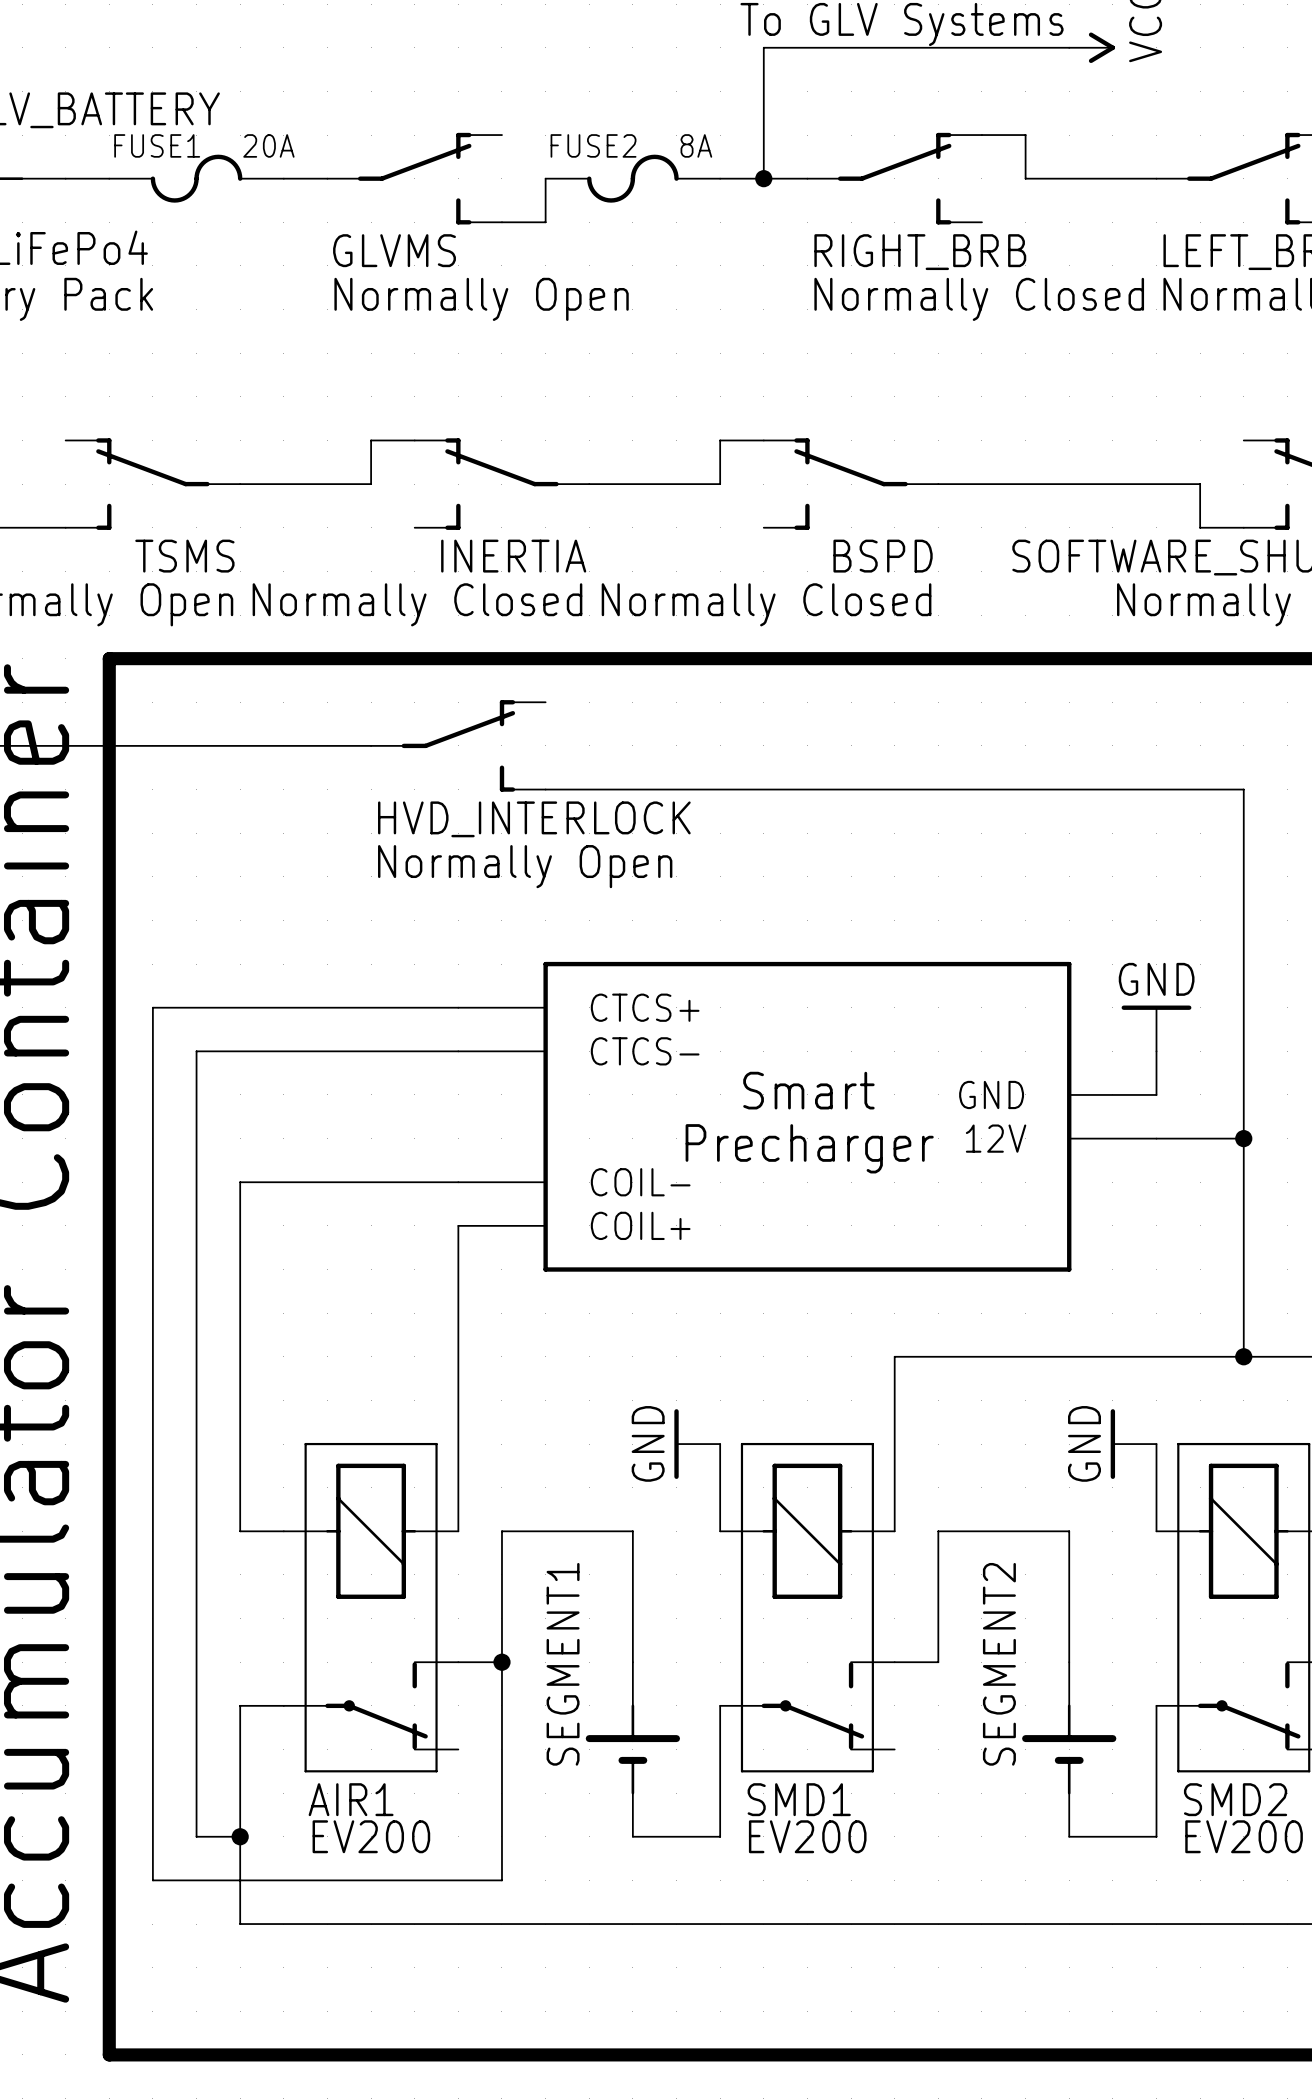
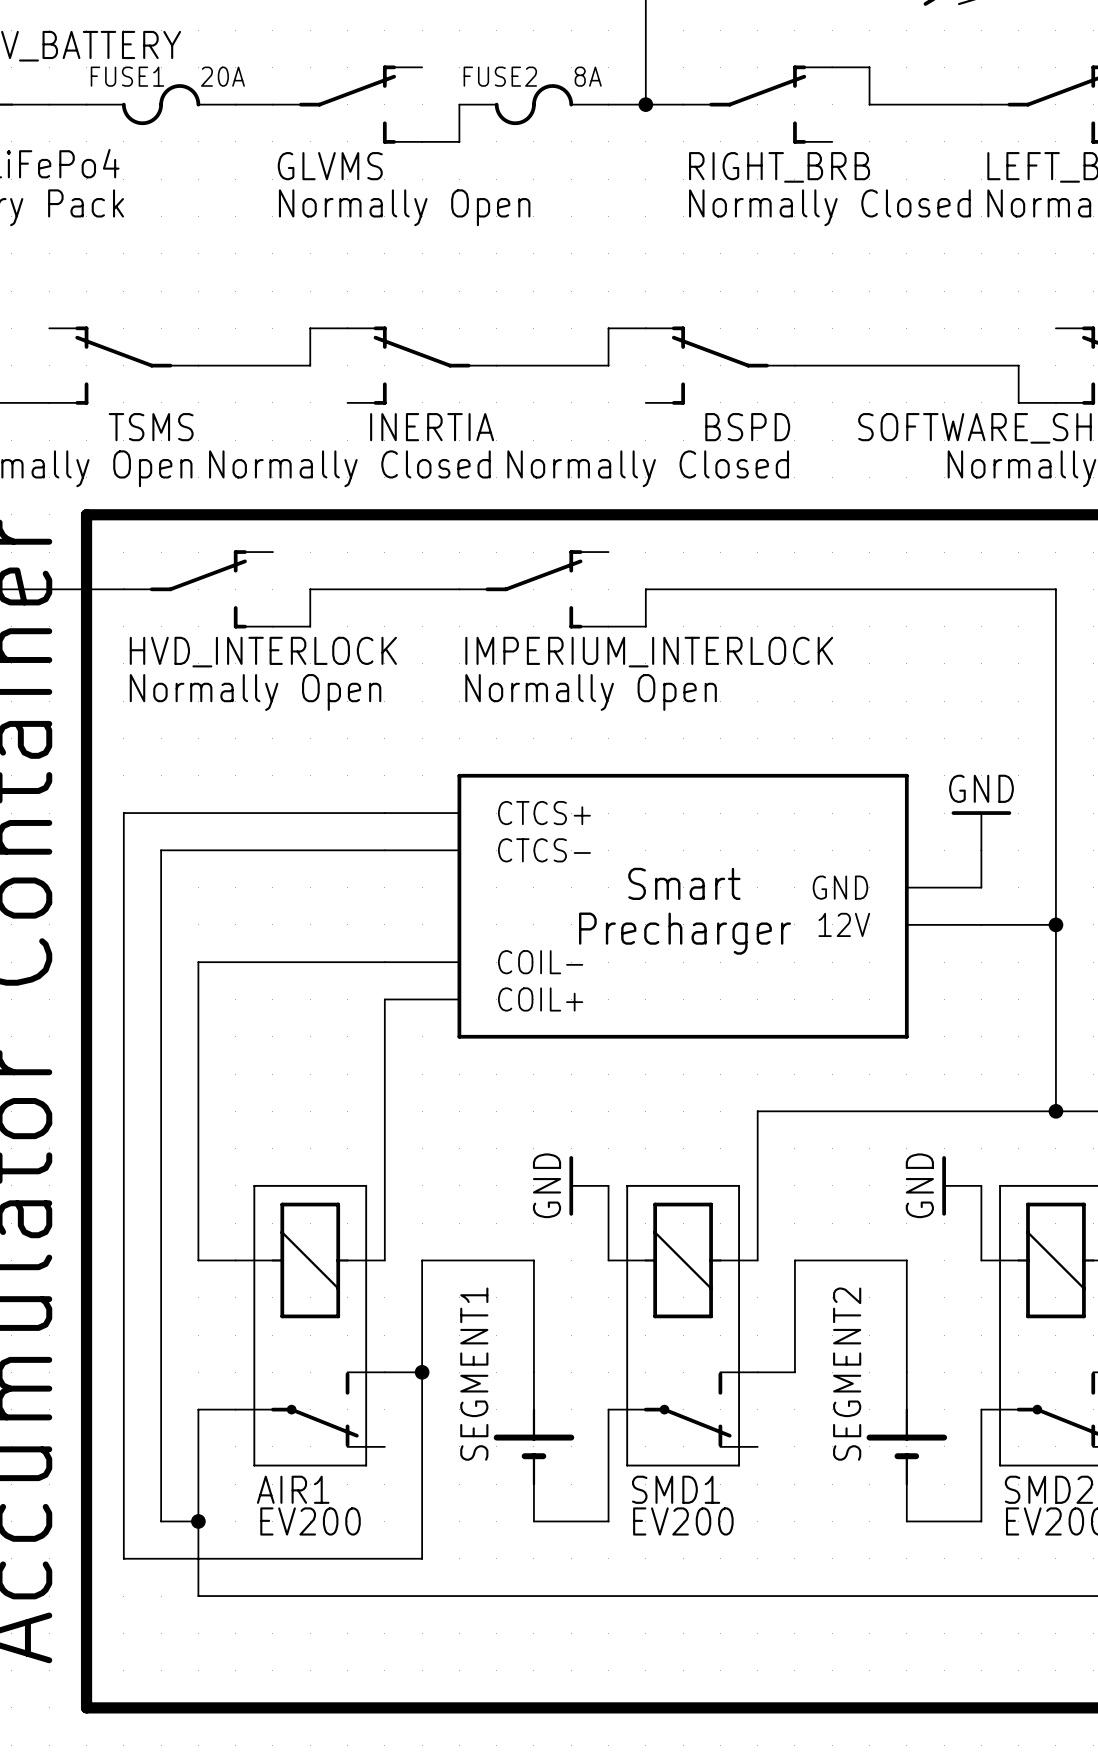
wire: (152, 745) (371, 745) -> none
HVD_INTERLOCK position: (458, 745) -> (198, 589)
wire: none -> (459, 589) (310, 589) (310, 626) (272, 626)
IMPERIUM_INTERLOCK: none -> Normally Open (533, 589)
wire: (545, 789) (720, 789) -> none
wire: (763, 789) (1243, 789) -> (645, 626) (645, 589) (1055, 589) (1055, 626)

